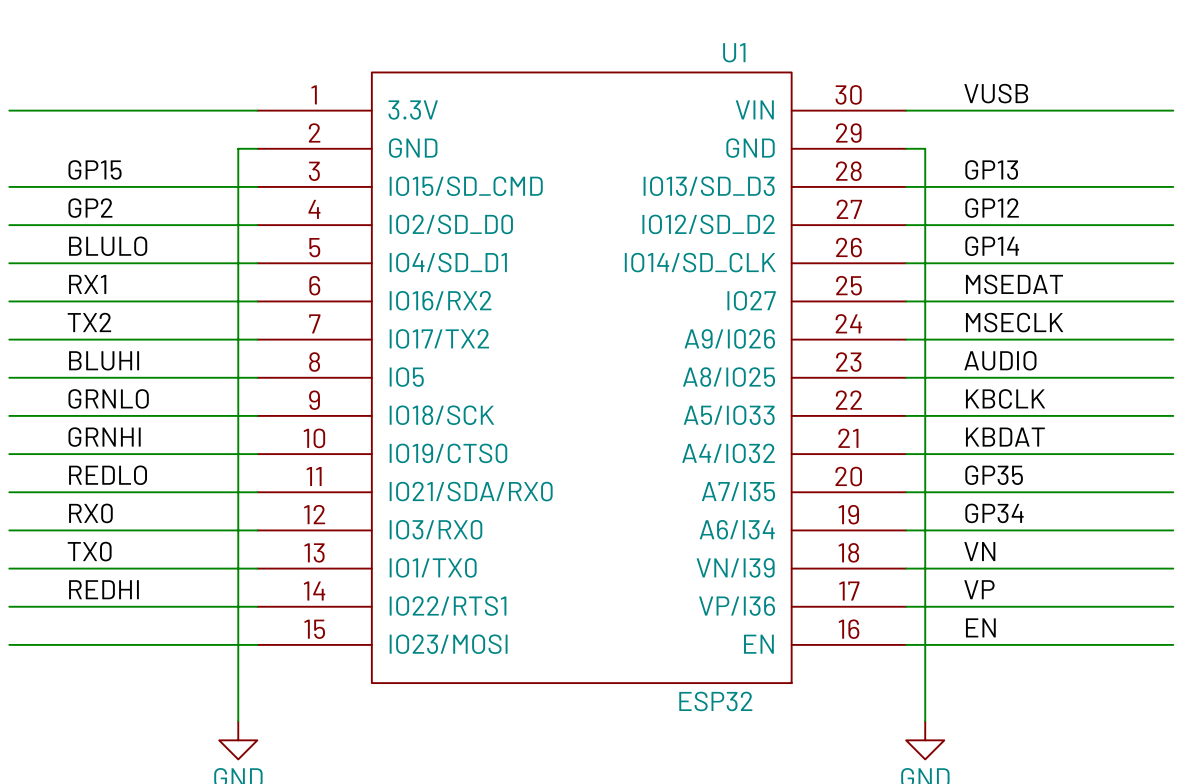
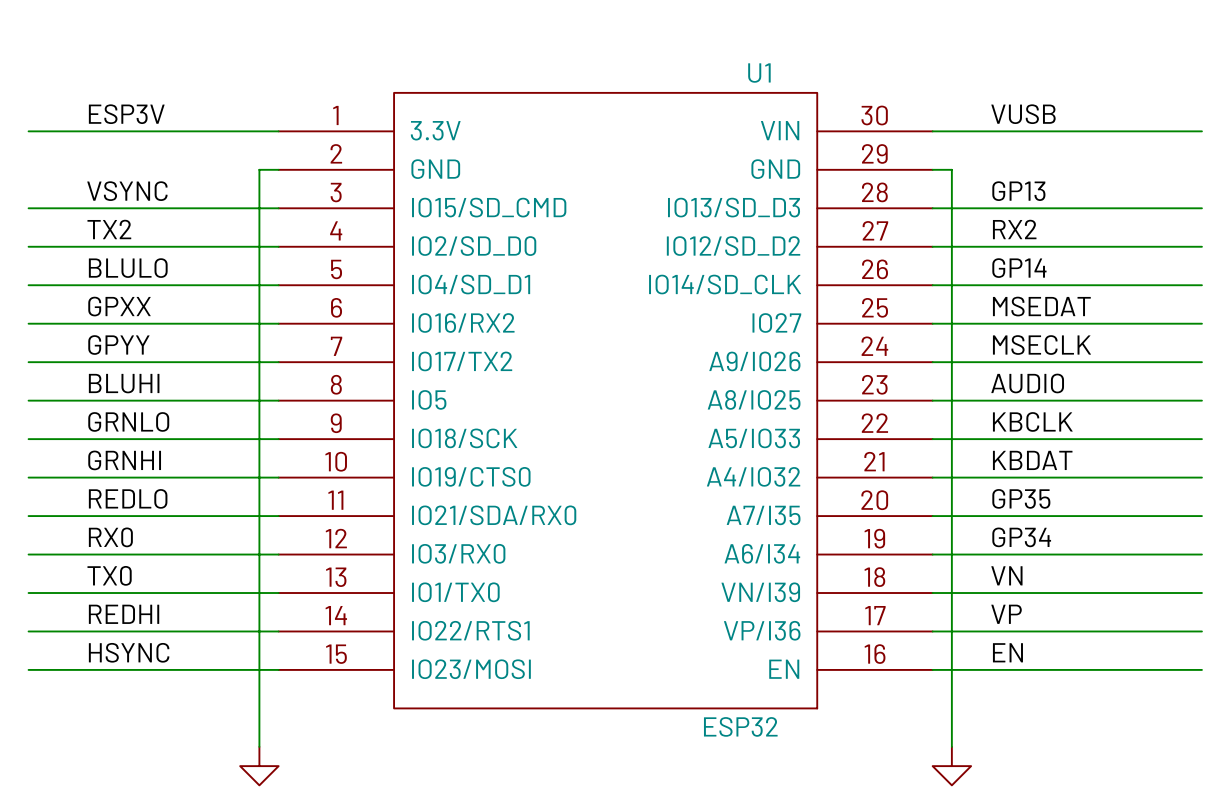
label: none -> ESP3V (126, 114)
label: GP15 (95, 169) -> VSYNC (127, 191)
label: GP2 (90, 208) -> TX2 (109, 229)
label: GP12 (992, 208) -> RX2 (1014, 229)
label: RX1 (87, 284) -> GPXX (119, 306)
label: TX2 (89, 322) -> GPYY (118, 345)
label: none -> HSYNC (129, 652)

